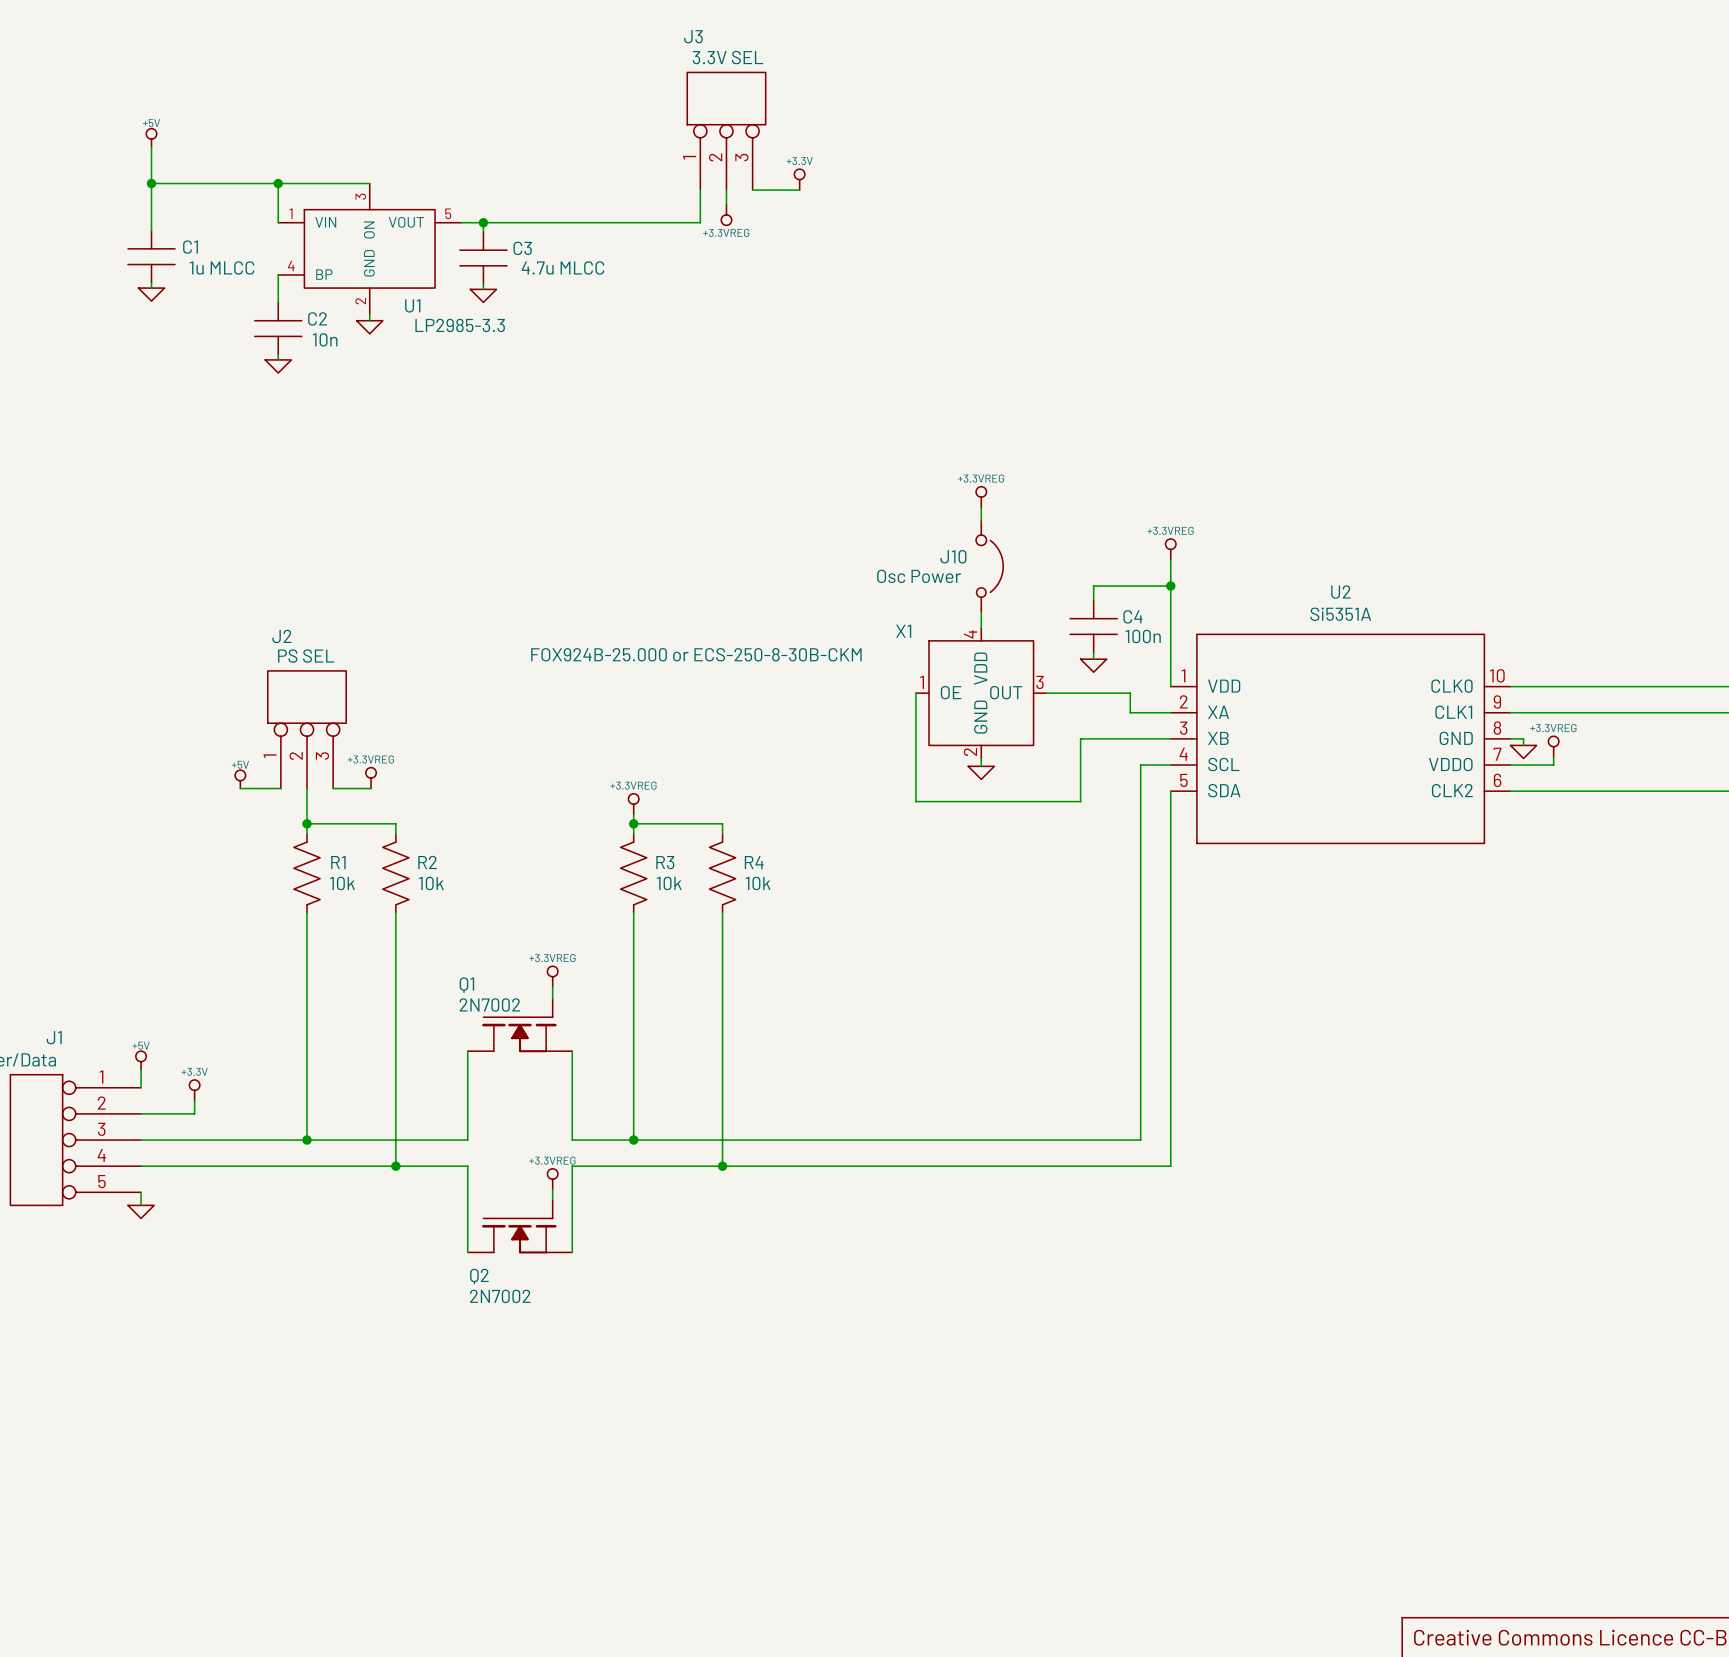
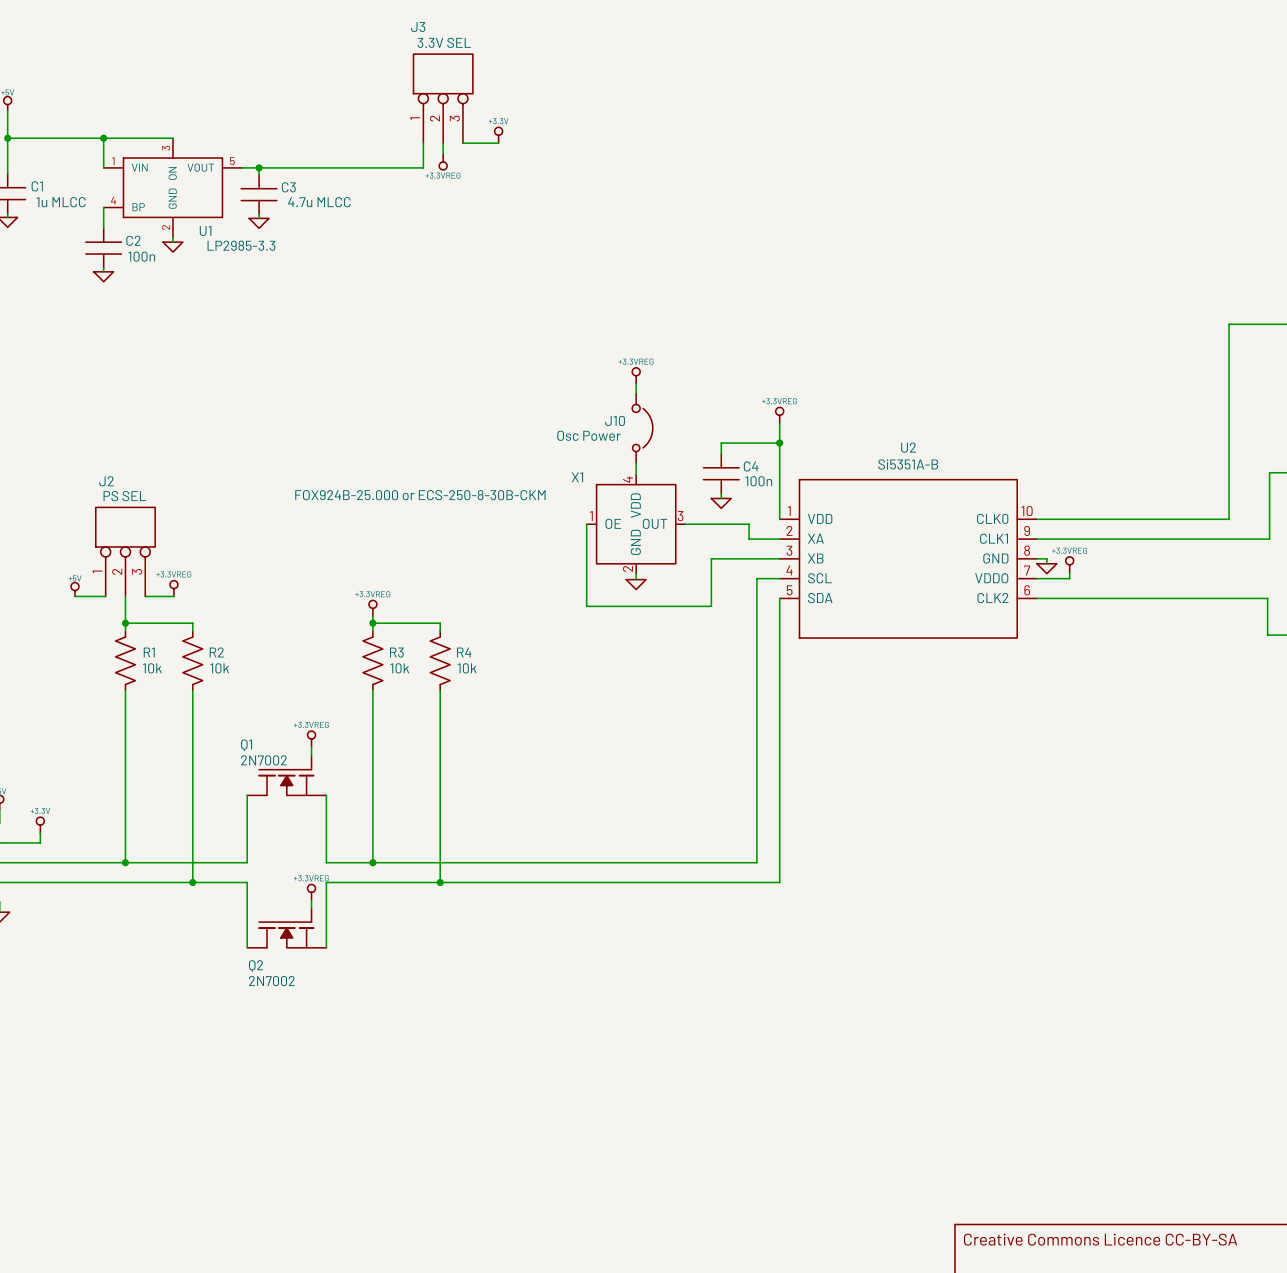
C2 value: 10n (325, 339) -> 100n (141, 256)
U2 value: Si5351A (1340, 614) -> Si5351A-B (908, 464)

